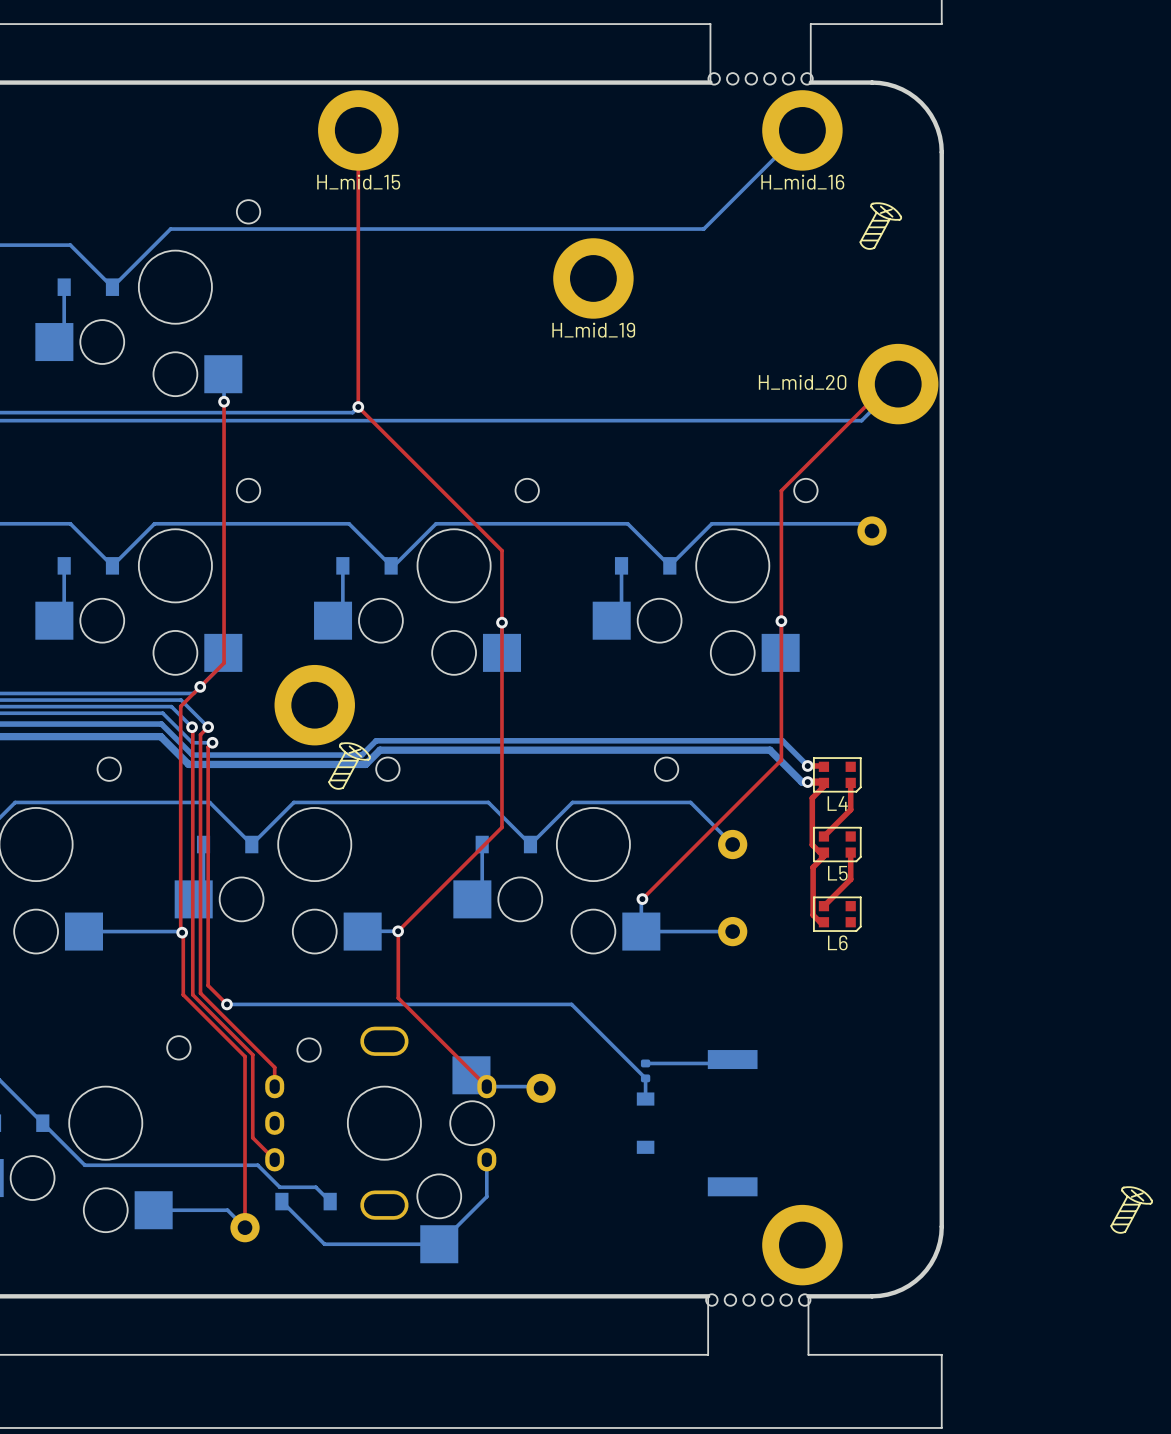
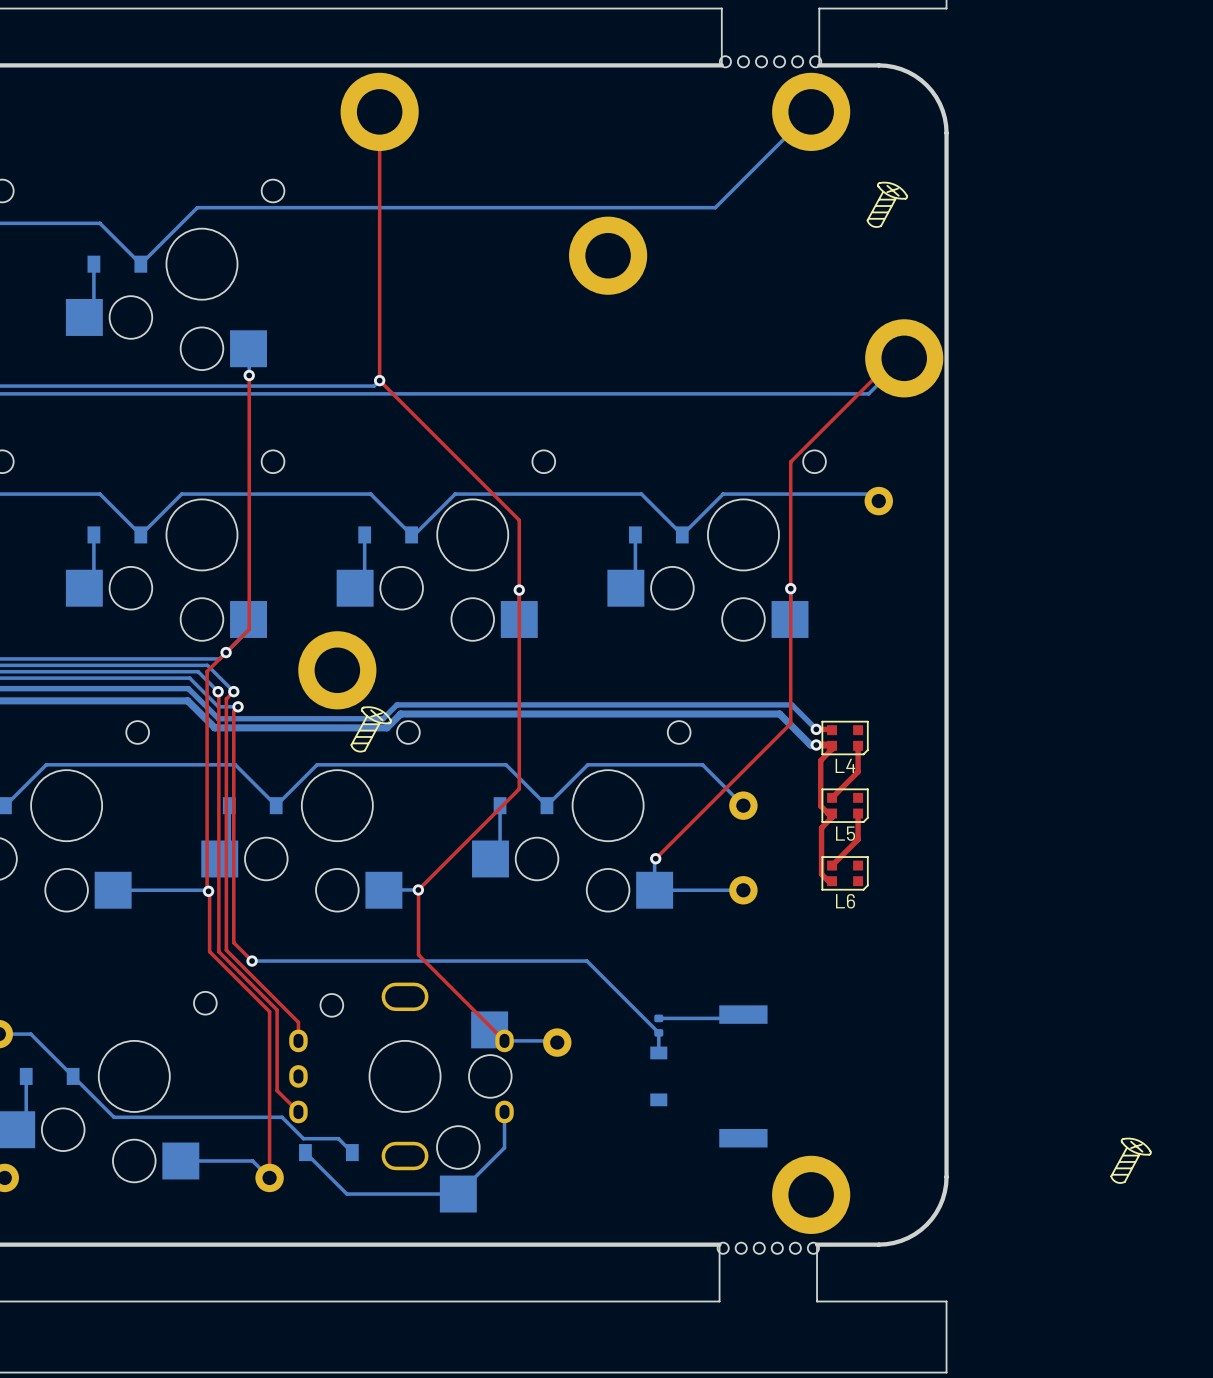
H_mid_15 name: H_mid_15 (358, 182) -> none
H_mid_16 name: H_mid_16 (802, 182) -> none
H_mid_19 name: H_mid_19 (593, 330) -> none
H_mid_20 name: H_mid_20 (802, 382) -> none

